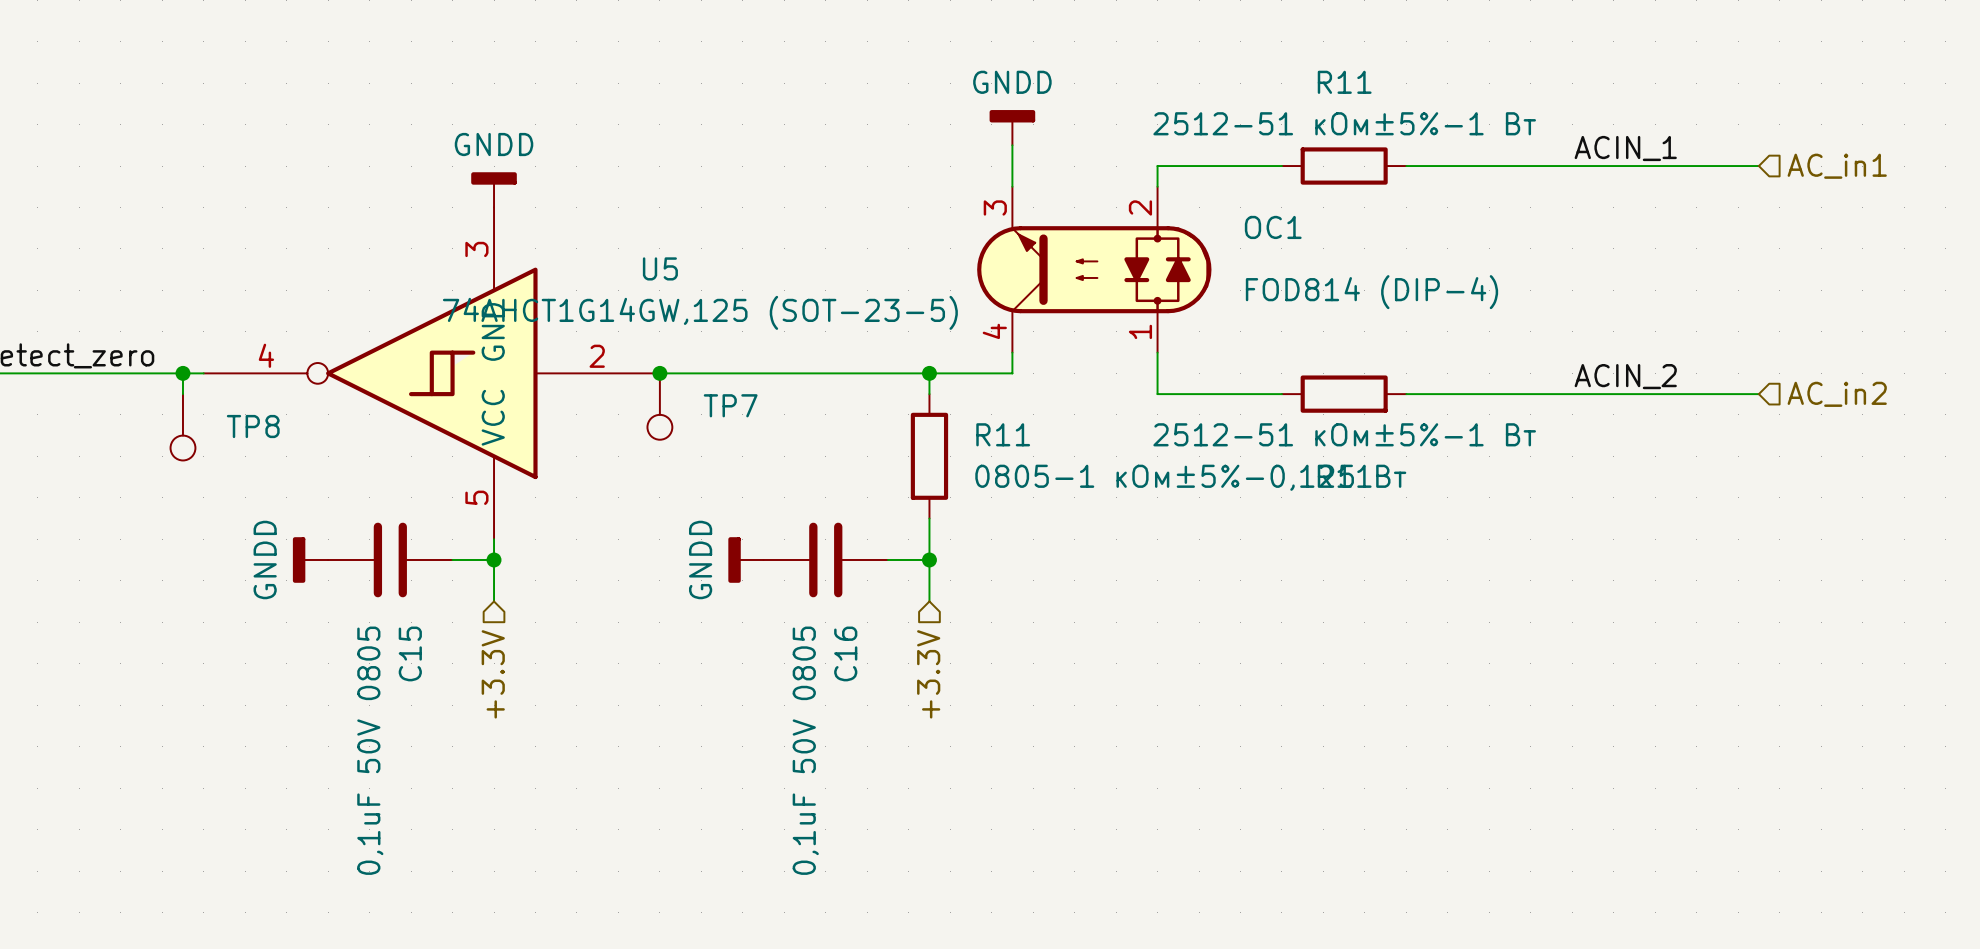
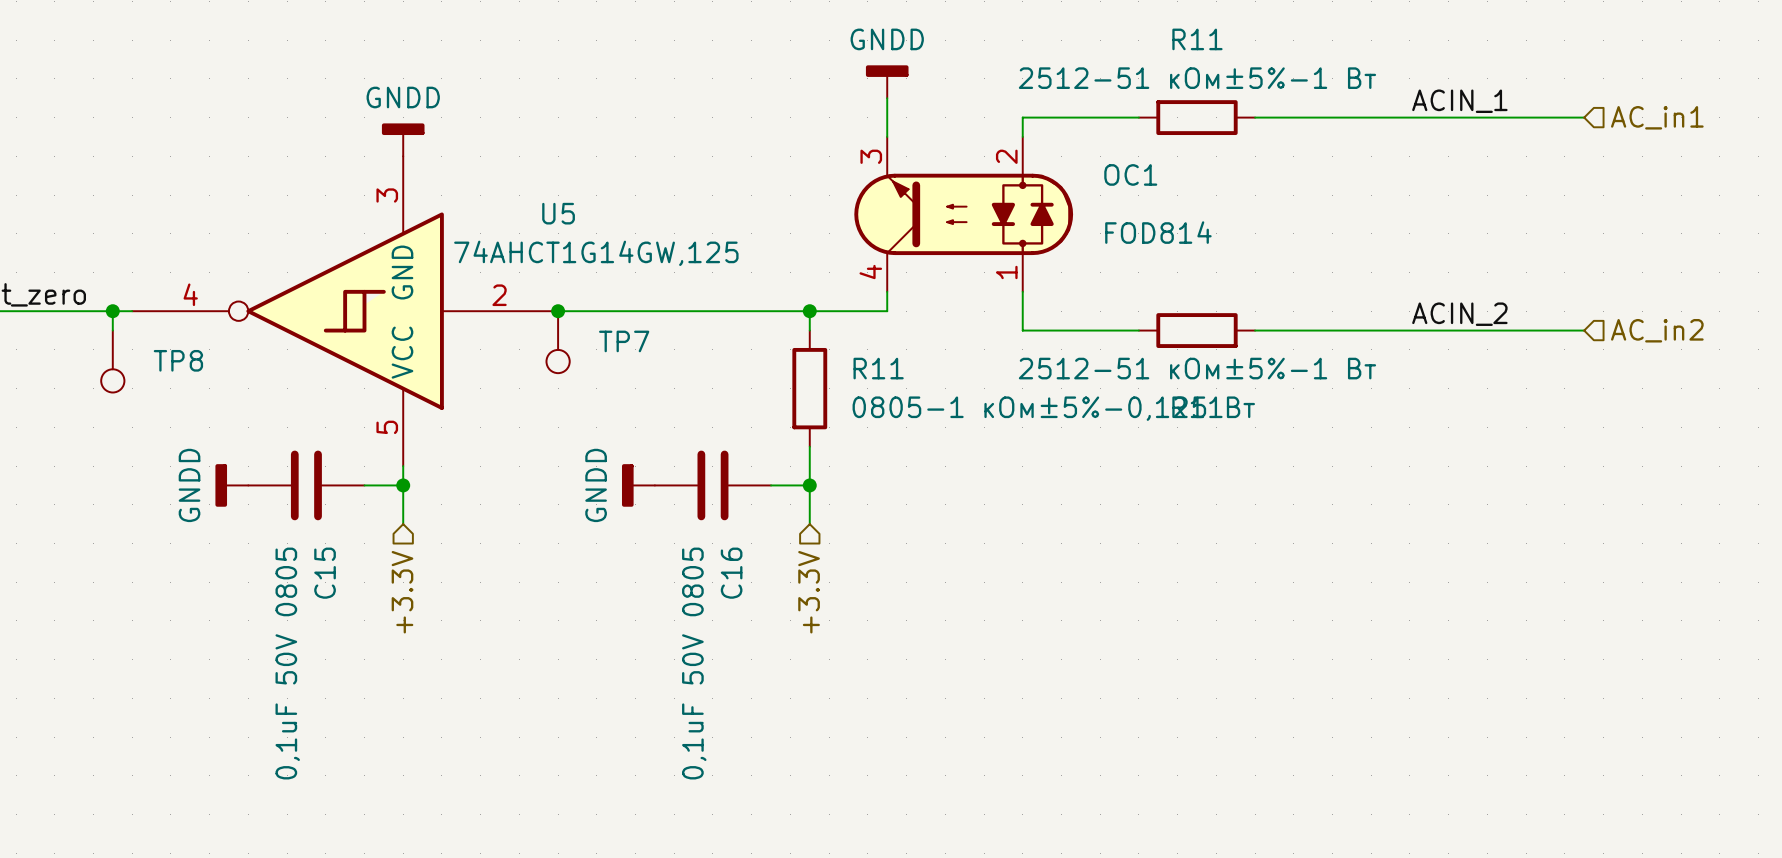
OC1 value: FOD814 (DIP-4) (1371, 292) -> FOD814 (1158, 232)
U5 value: 74AHCT1G14GW,125 (SOT-23-5) (700, 312) -> 74AHCT1G14GW,125 (596, 253)

